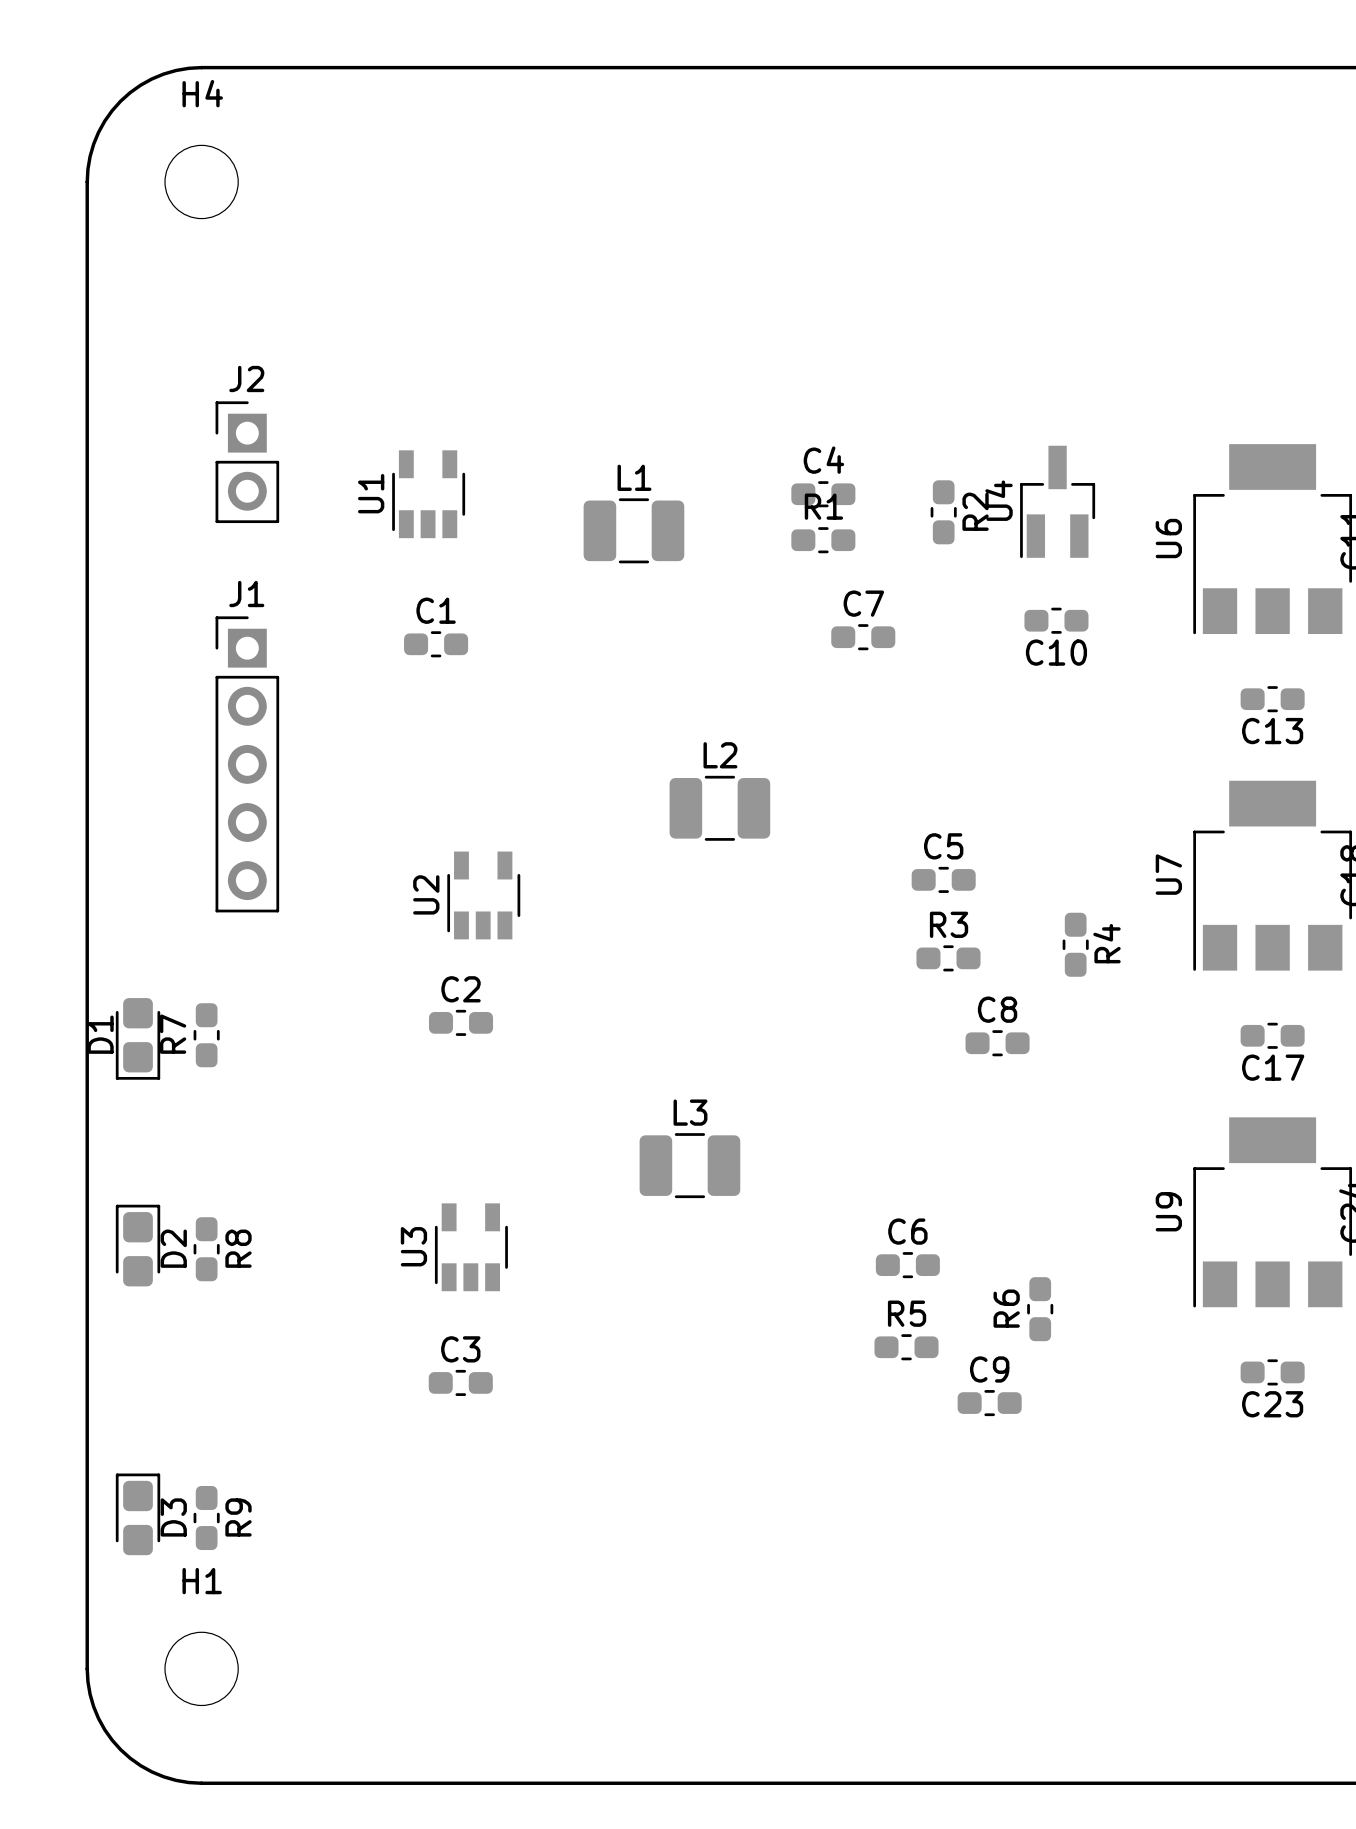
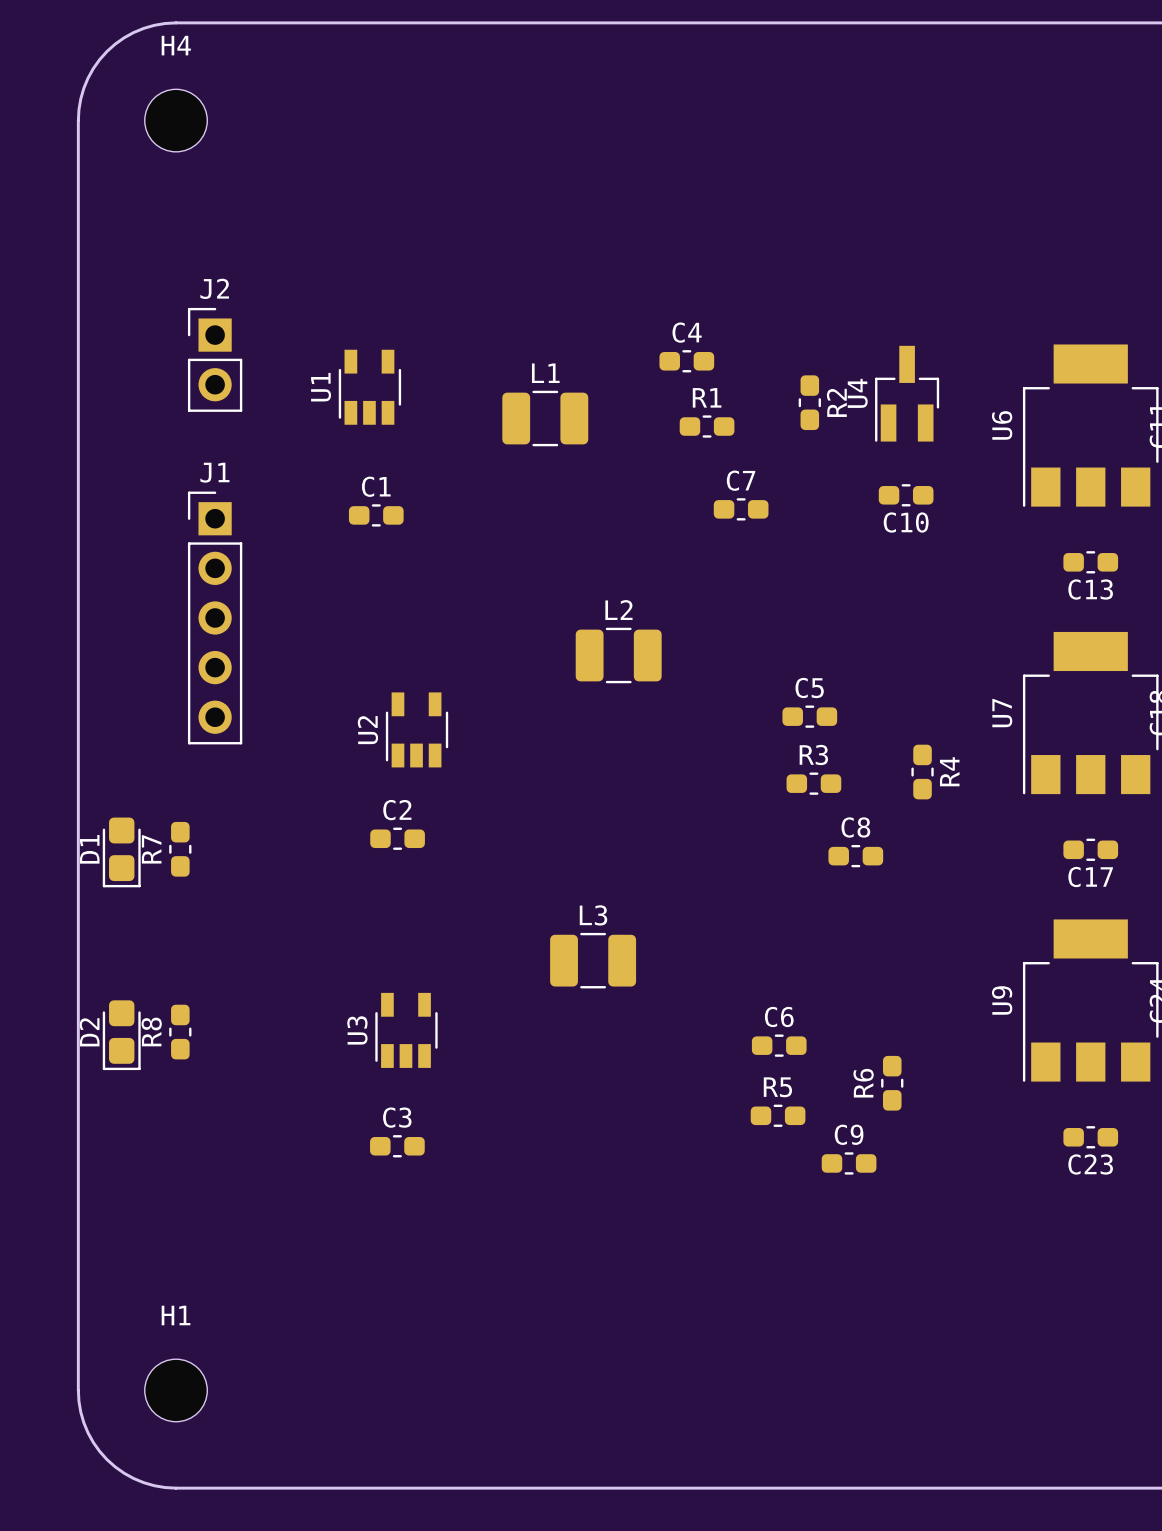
C4 position: (823, 494) -> (686, 361)
D2 rotation: 0° (138, 1245) -> 180° (121, 1035)
R8 name position: R8 (238, 1248) -> R8 (151, 1031)
D3: (138, 1514) -> none
R9: (206, 1518) -> none

